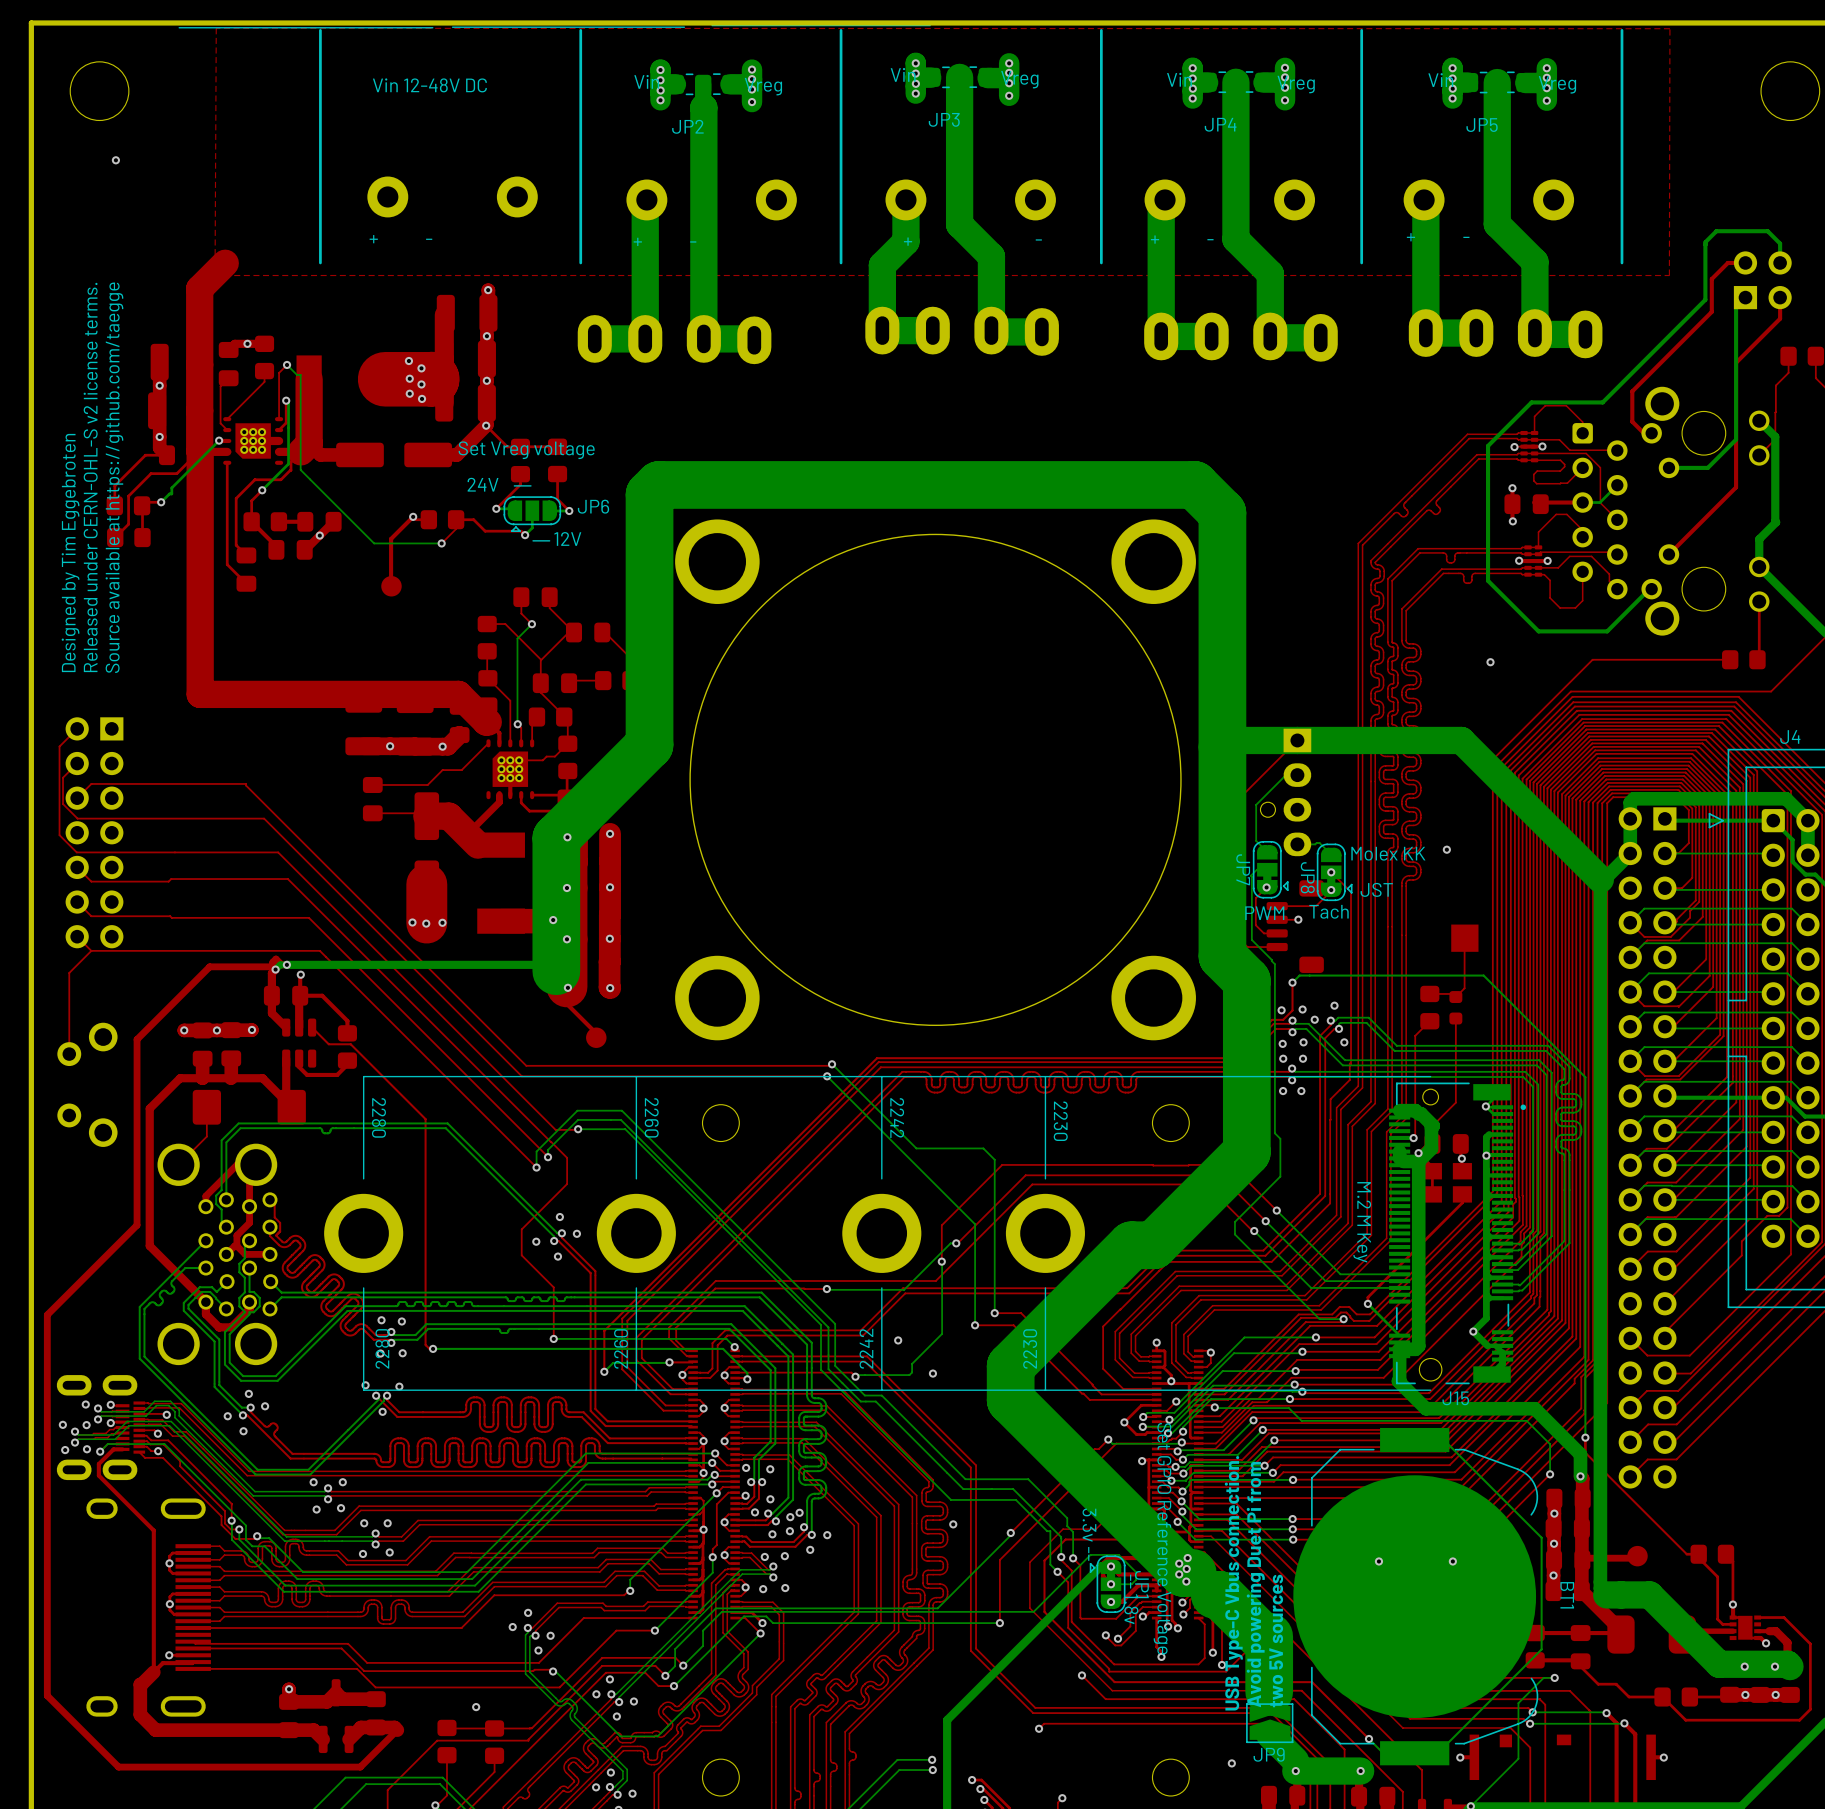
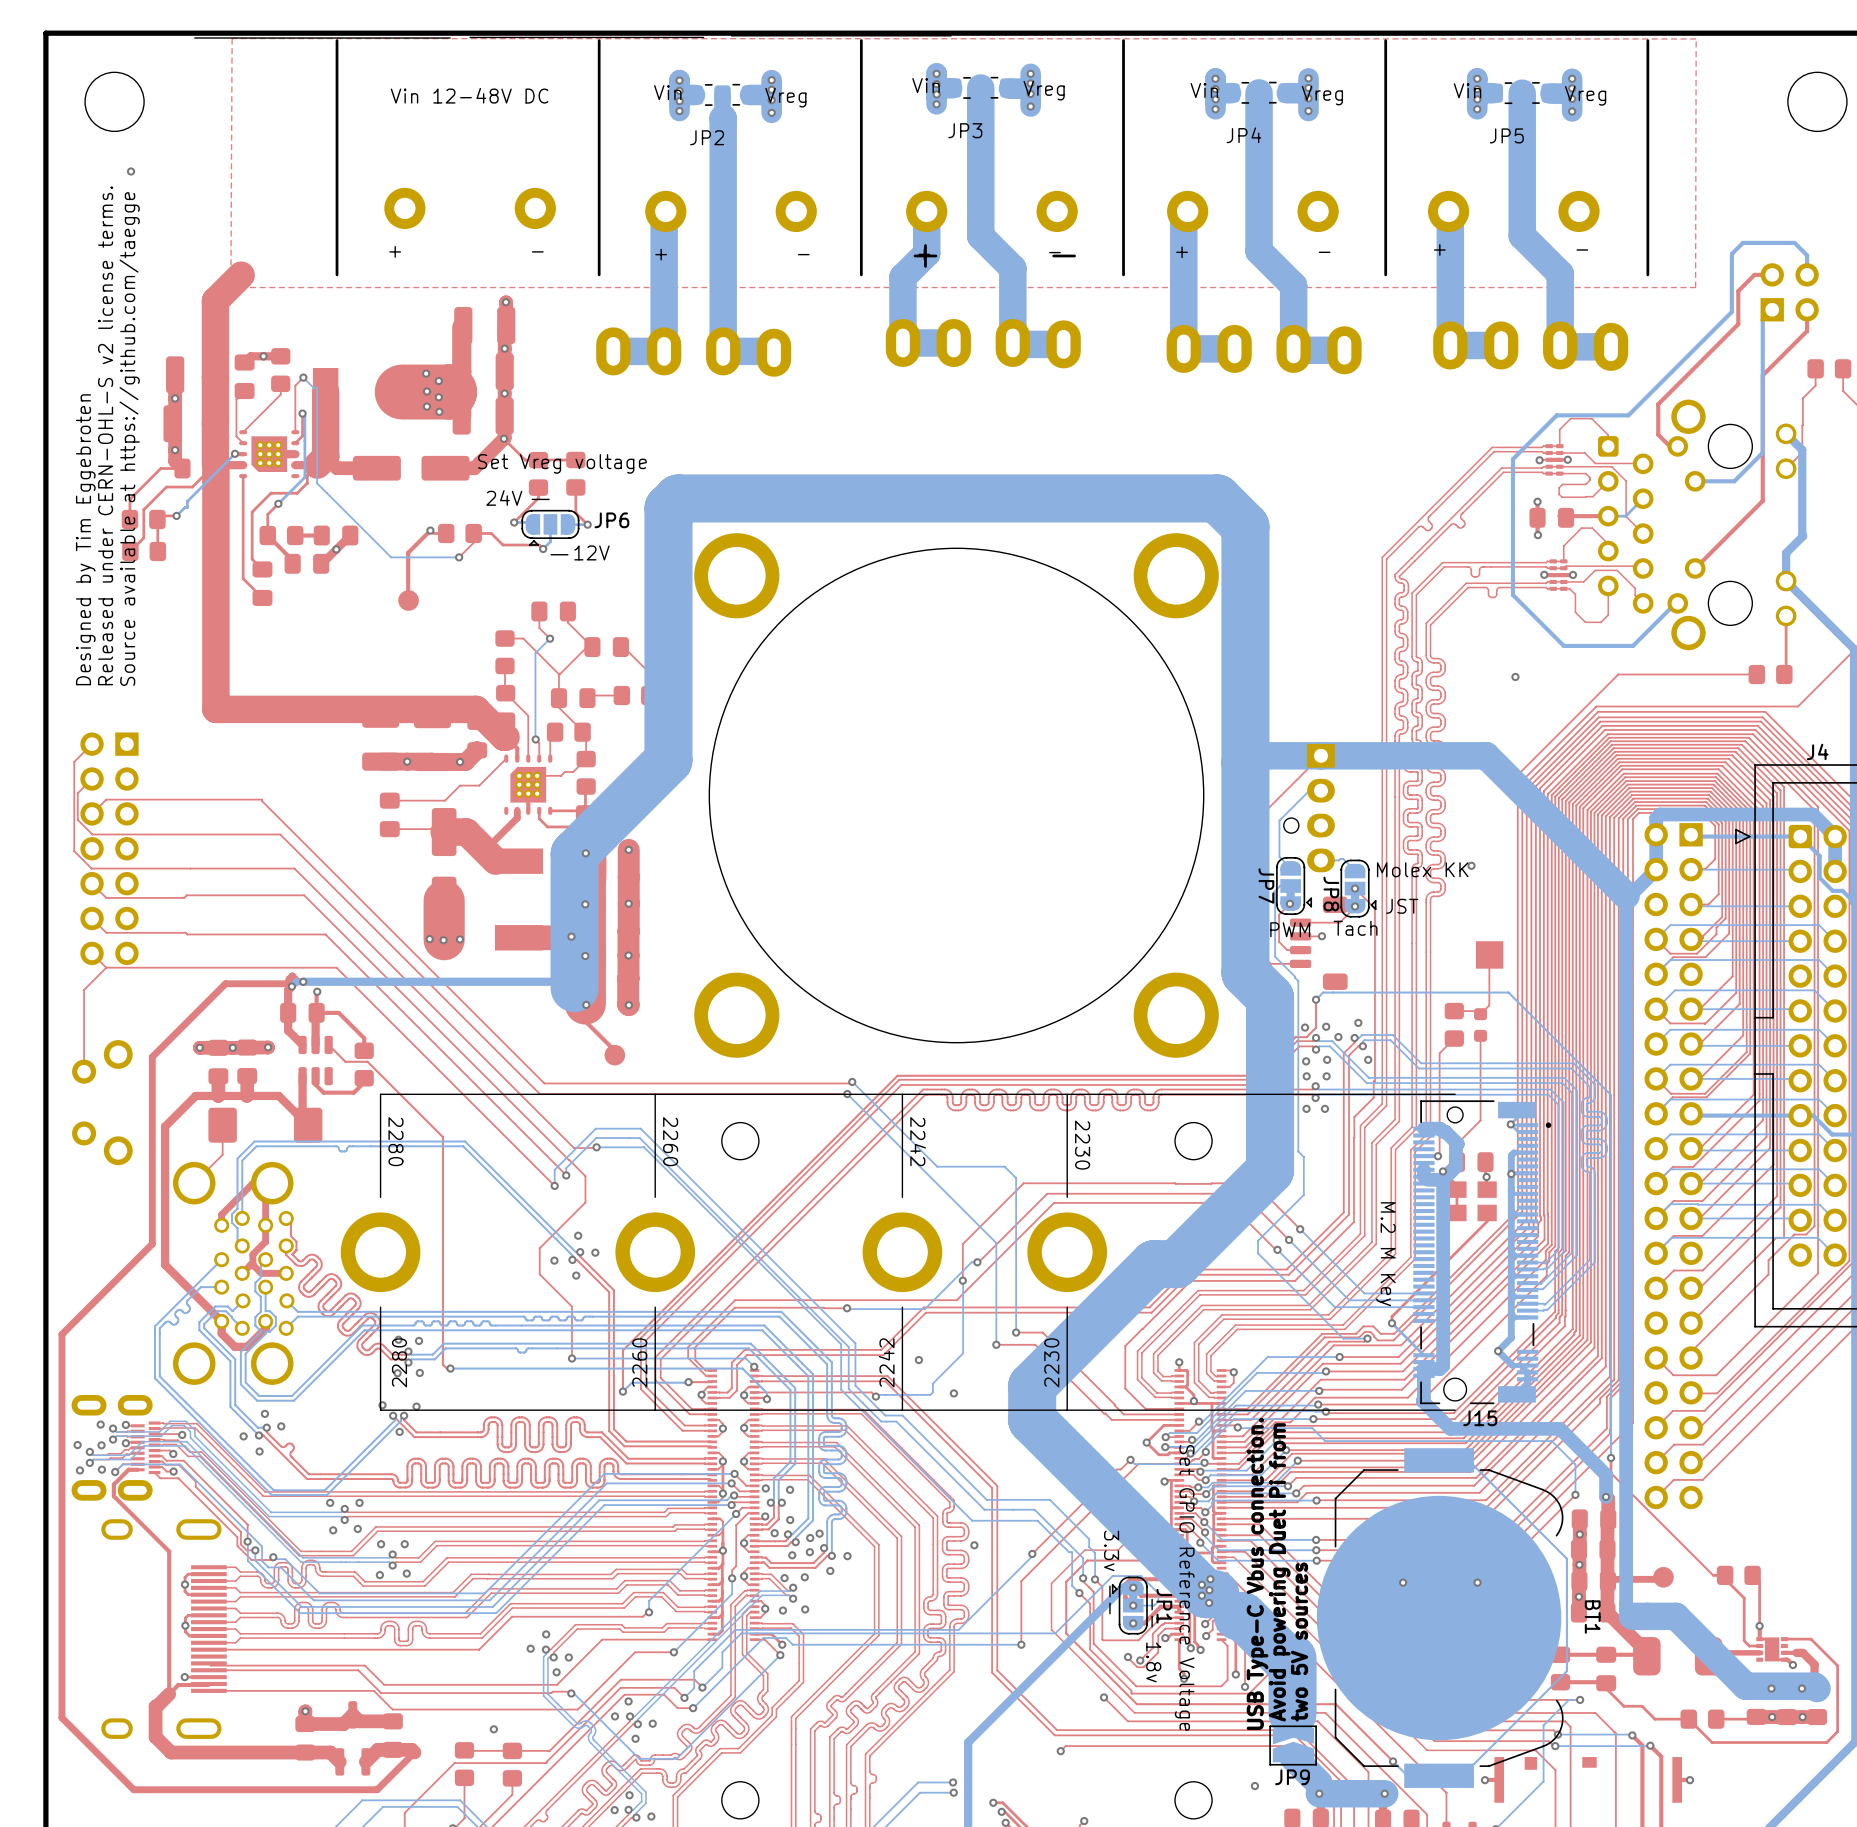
text: none -> + - (994, 255)

